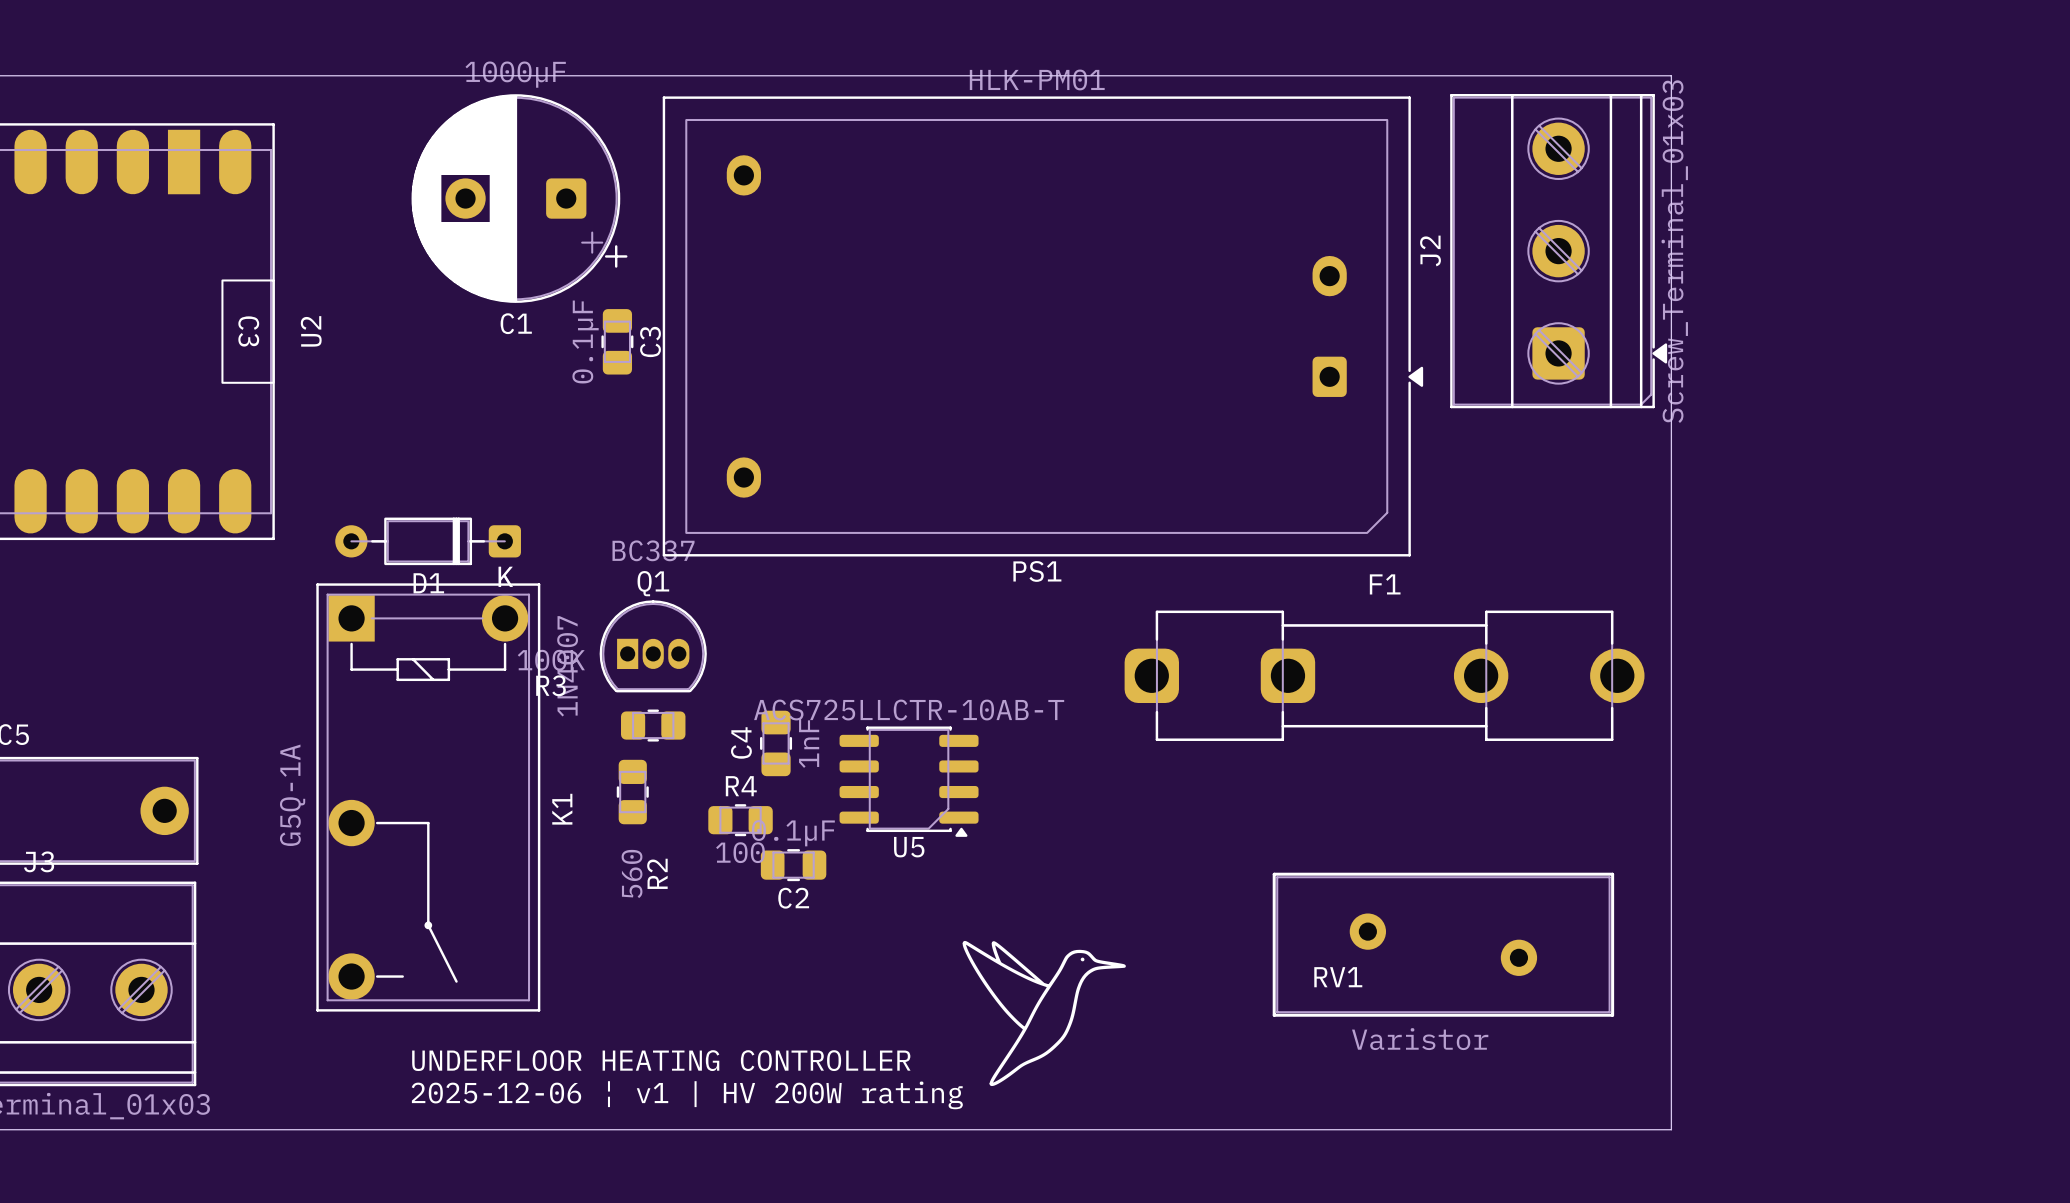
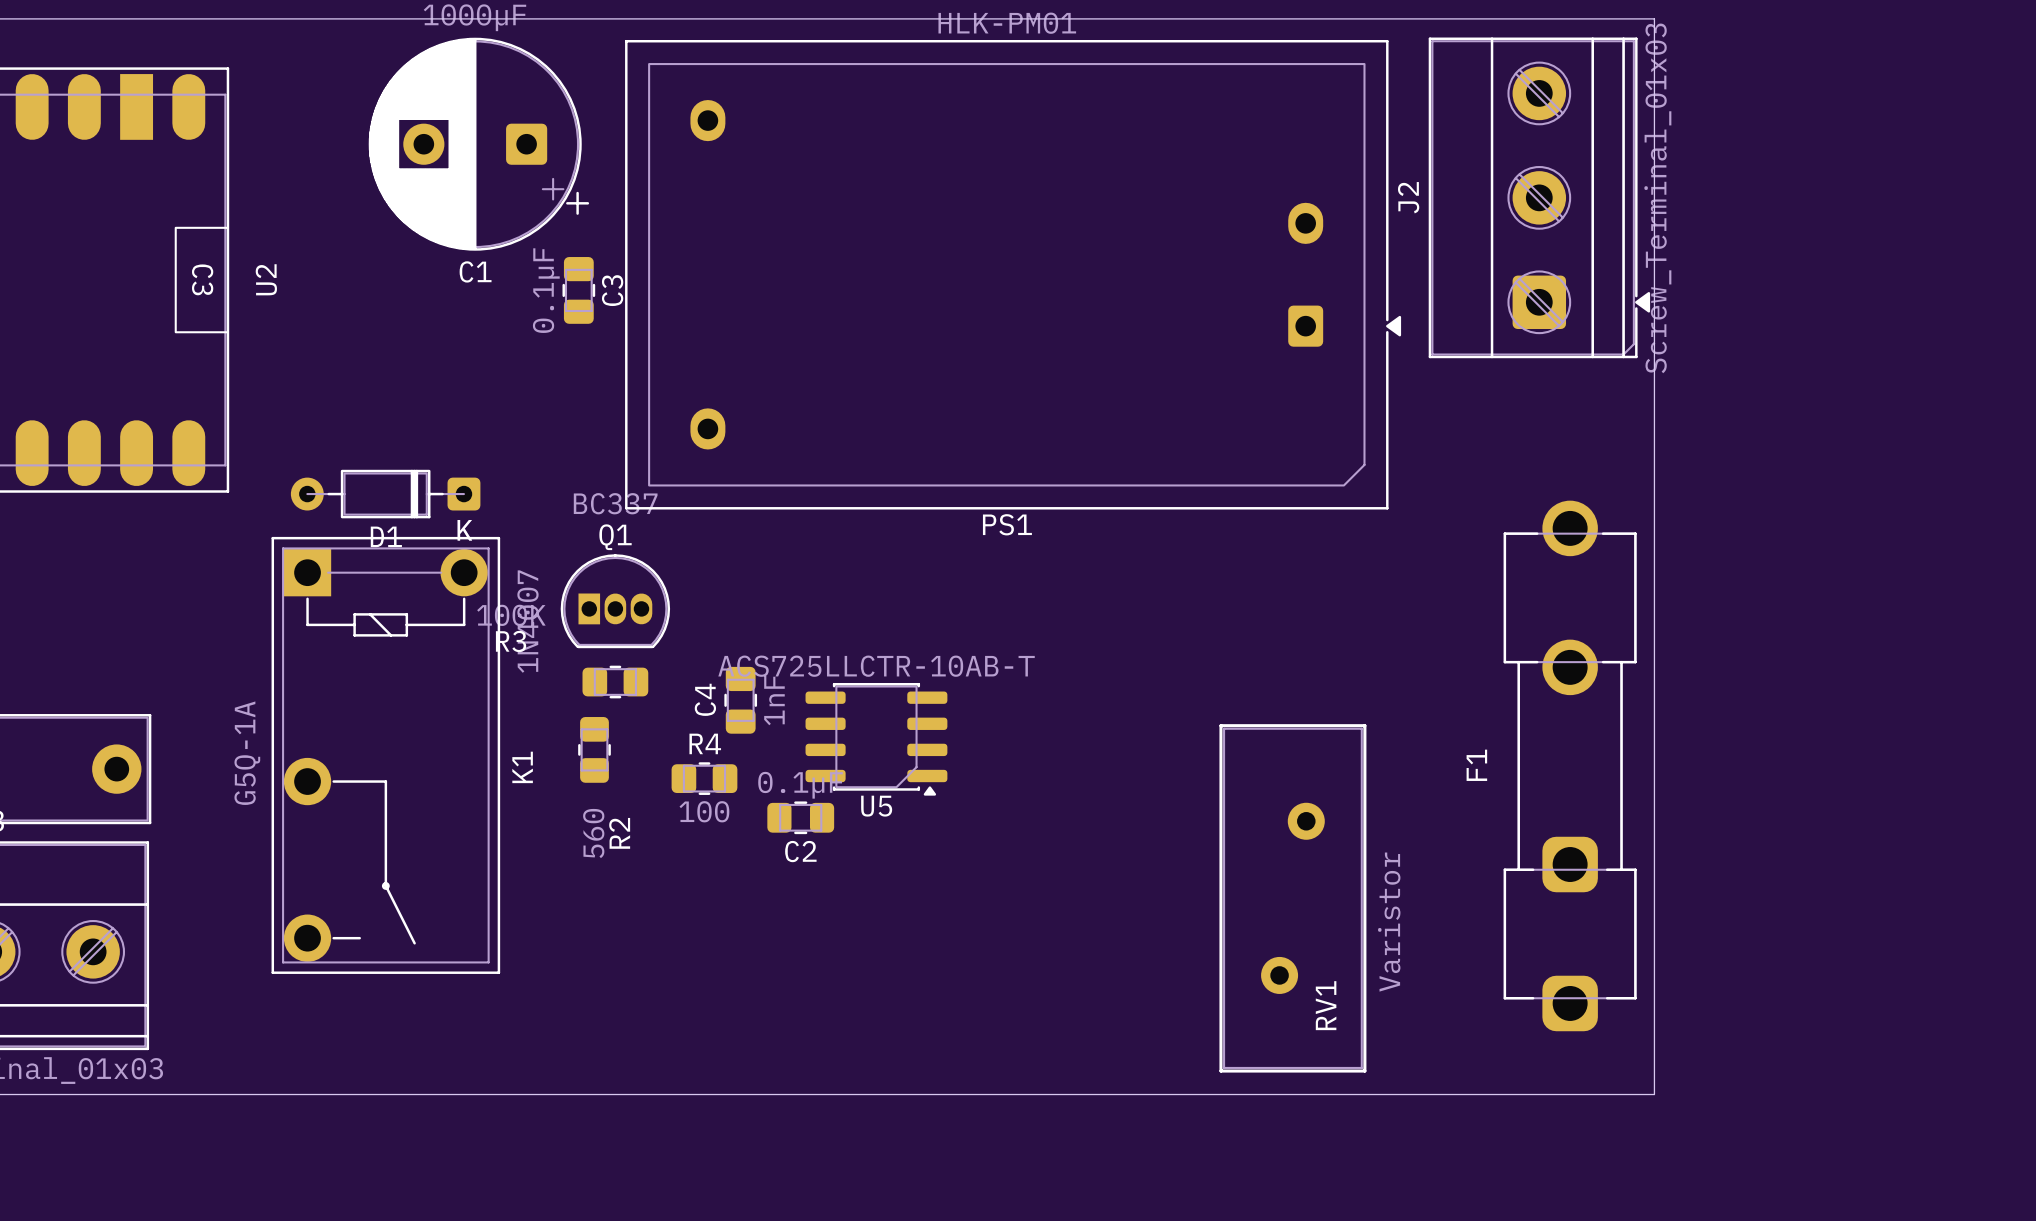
F1 rotation: 0° (1384, 675) -> 90° counterclockwise (1570, 765)
C2 position: (793, 865) -> (800, 817)
drawing: [962, 940, 1126, 1087] -> none
RV1 rotation: 0° (1443, 944) -> 90° clockwise (1292, 898)
RV1 name position: RV1 (1338, 977) -> RV1 (1326, 1005)
RV1 value position: Varistor (1420, 1039) -> Varistor (1389, 922)
text: UNDERFLOOR HEATING CONTROLLER (661, 1060) -> none
text: 2025-12-06 ¦ v1 | HV 200W rating (687, 1095) -> none

